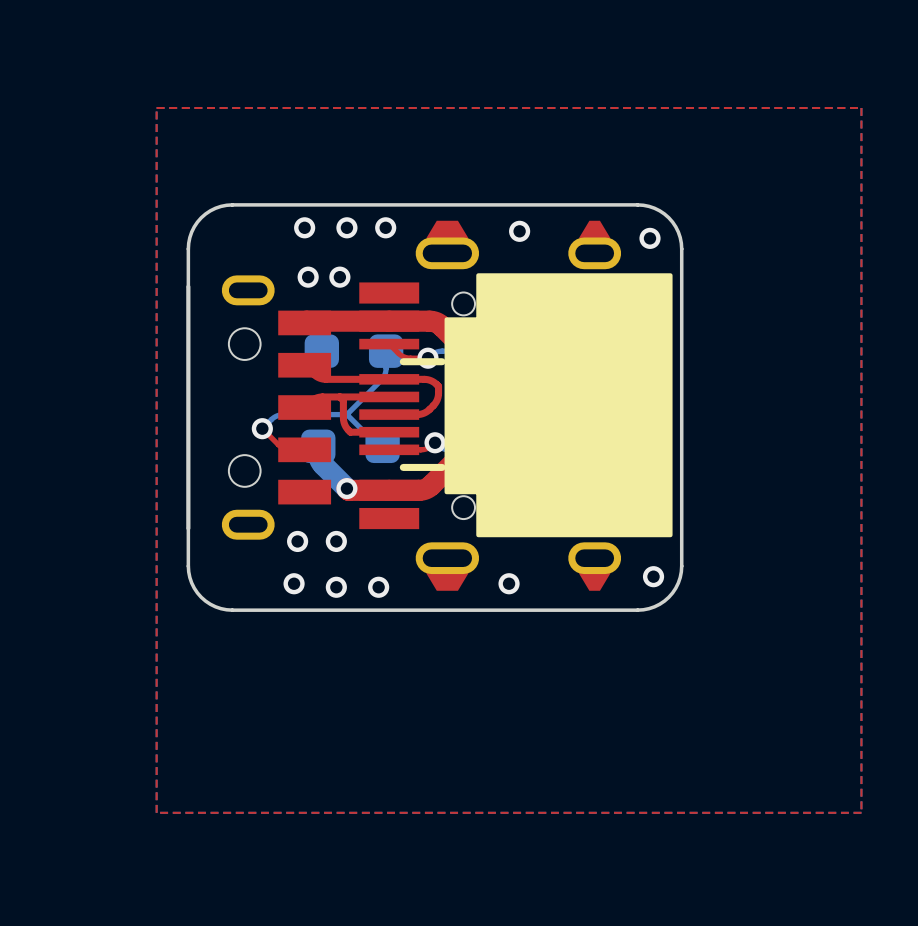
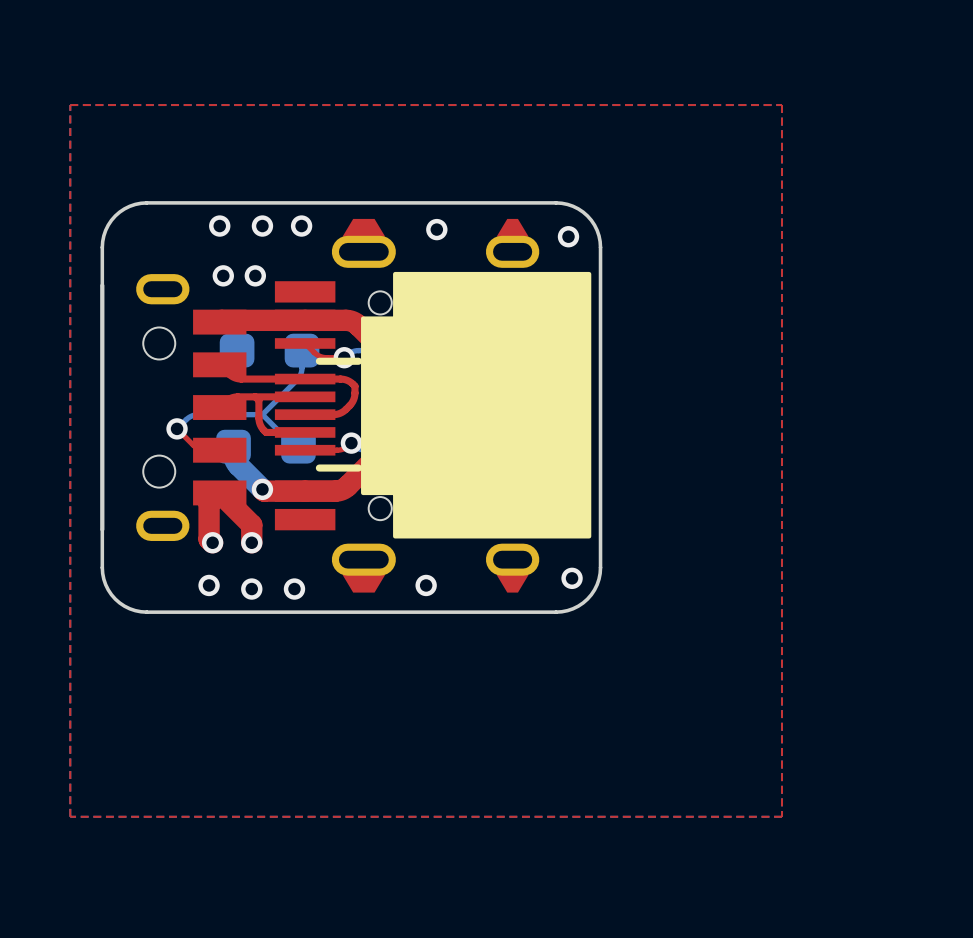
top track: none -> (212, 542) (209, 539) (209, 503) (219, 492) (251, 524) (251, 542)

